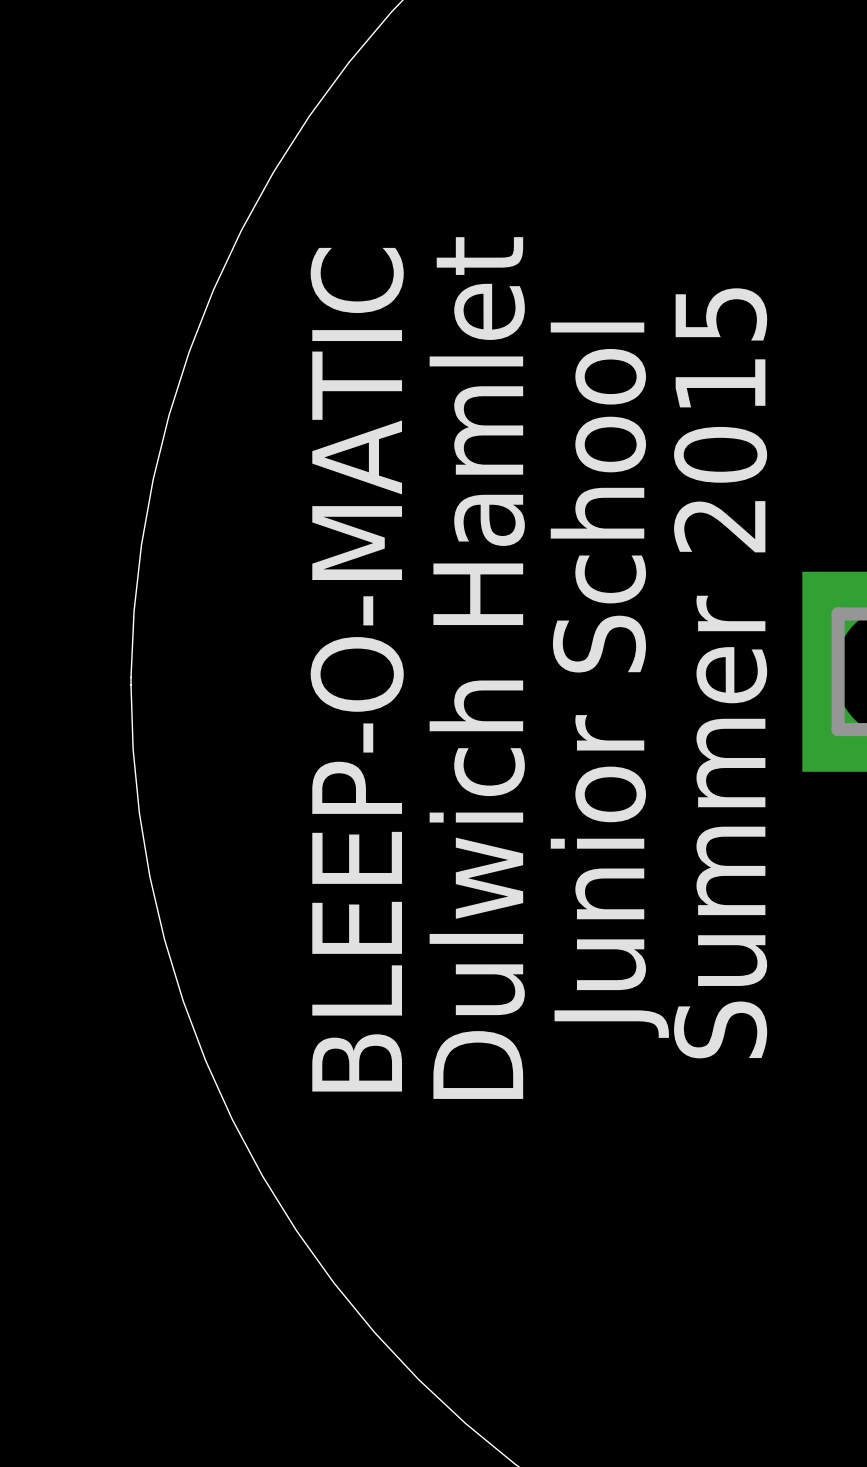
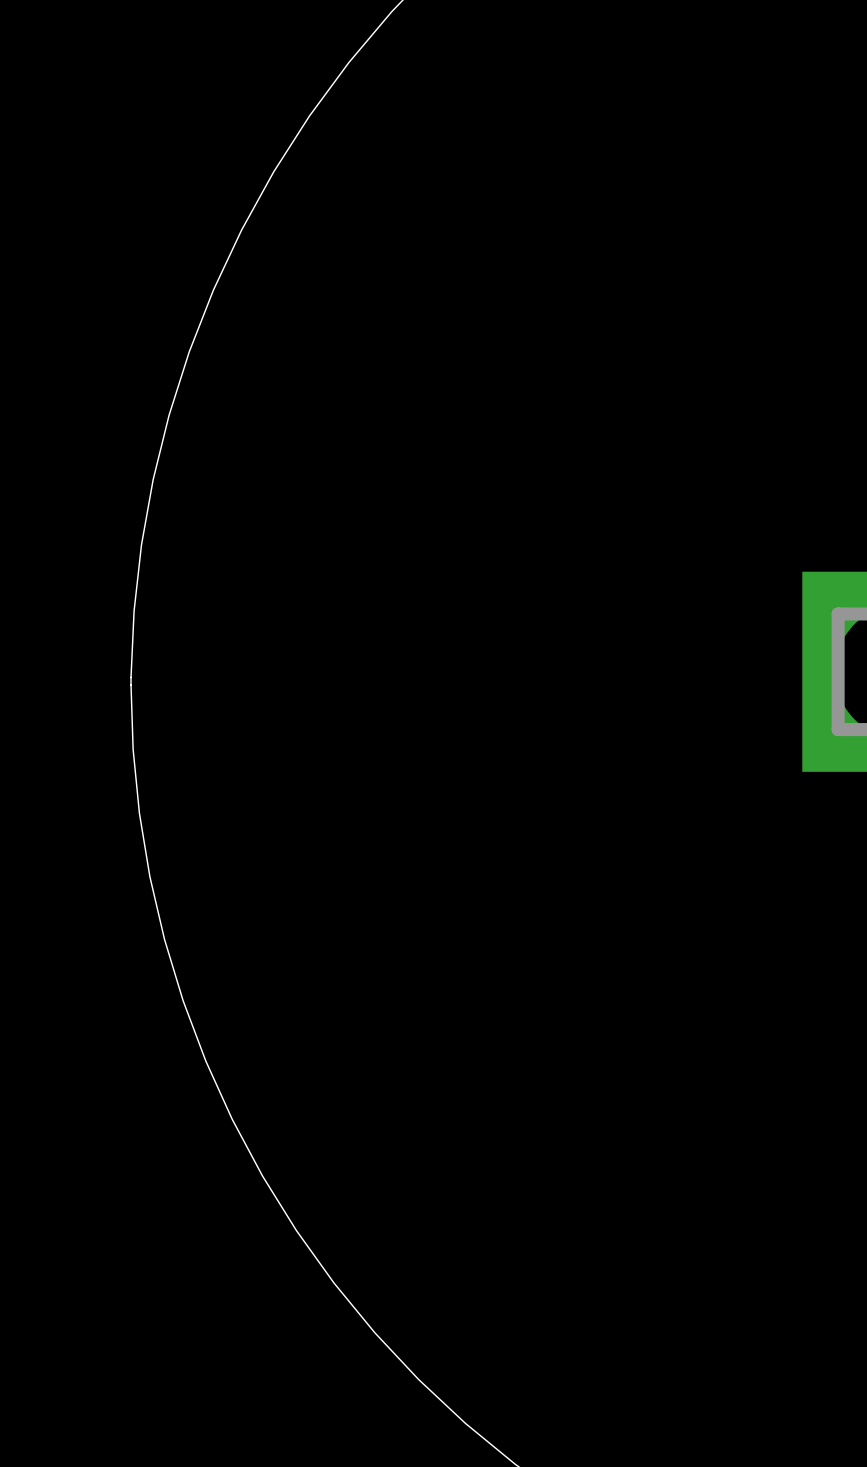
text: Dulwich Hamlet (477, 668) -> none
text: BLEEP-O-MATIC (357, 669) -> none
text: Summer 2015 (720, 673) -> none
text: Junior School (609, 680) -> none

